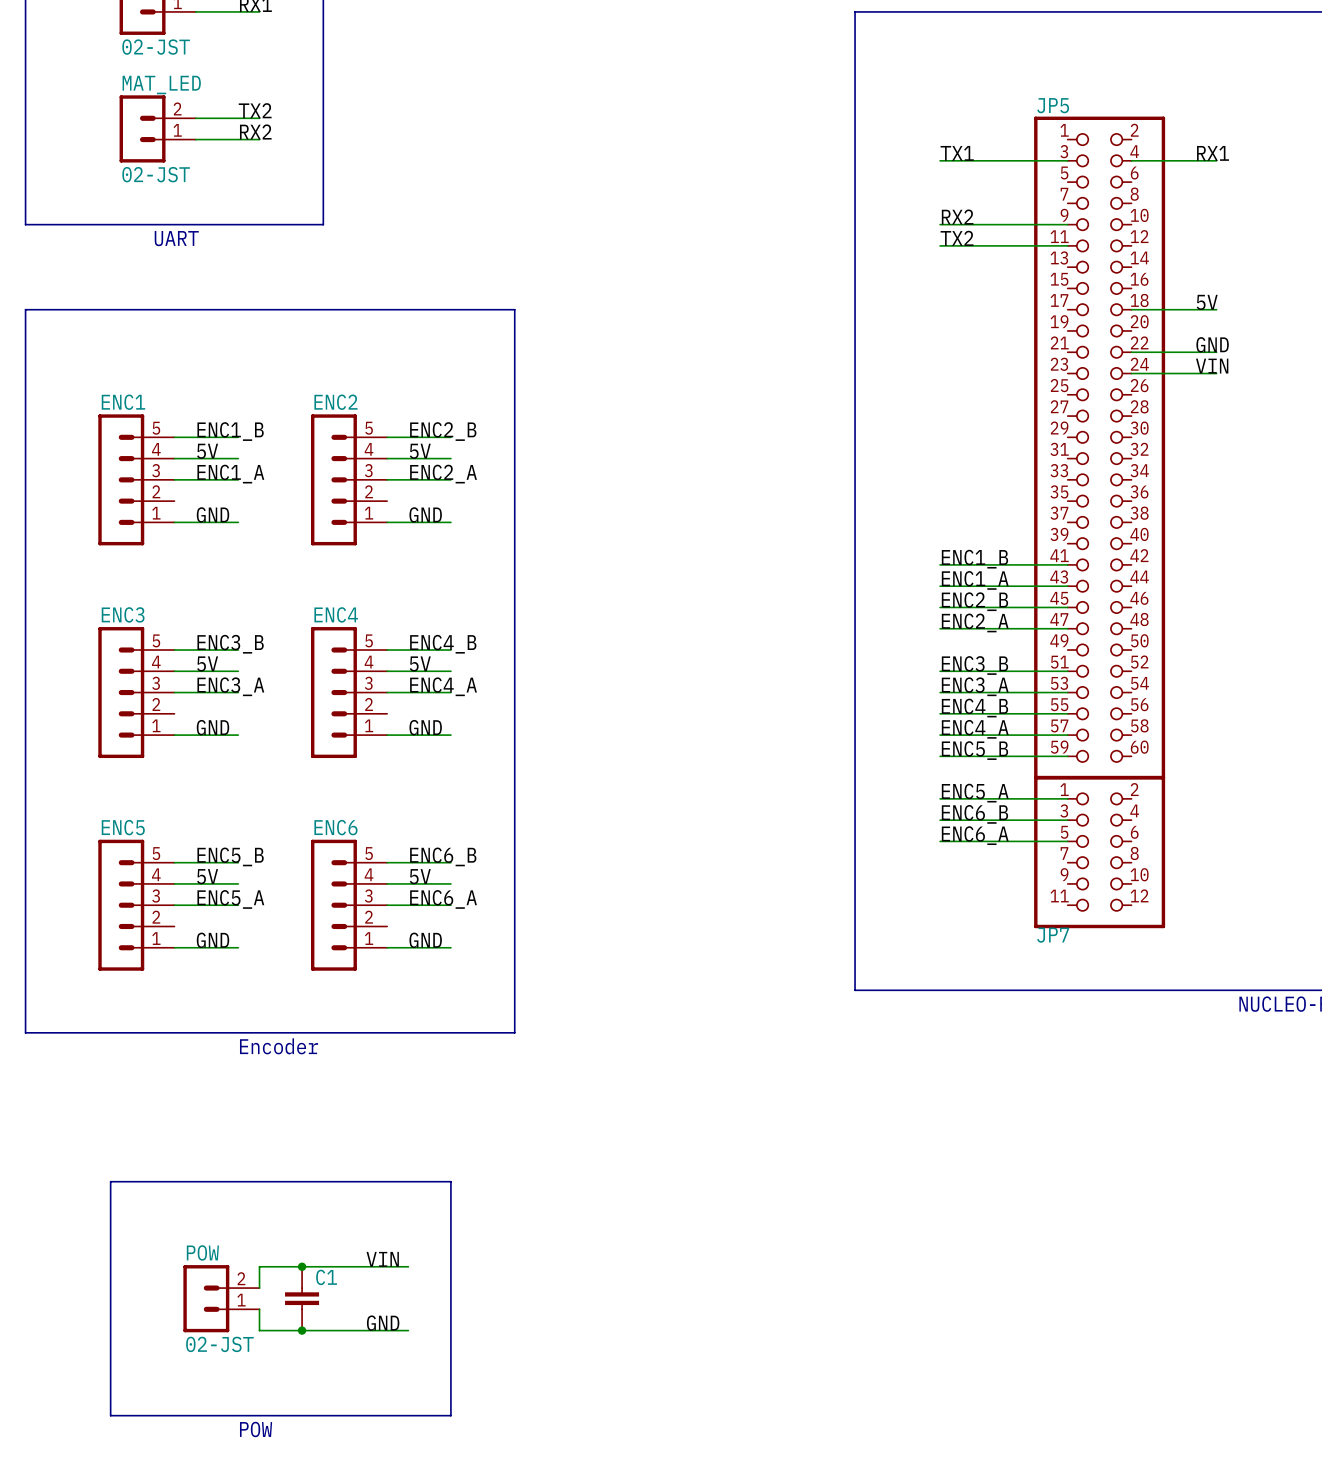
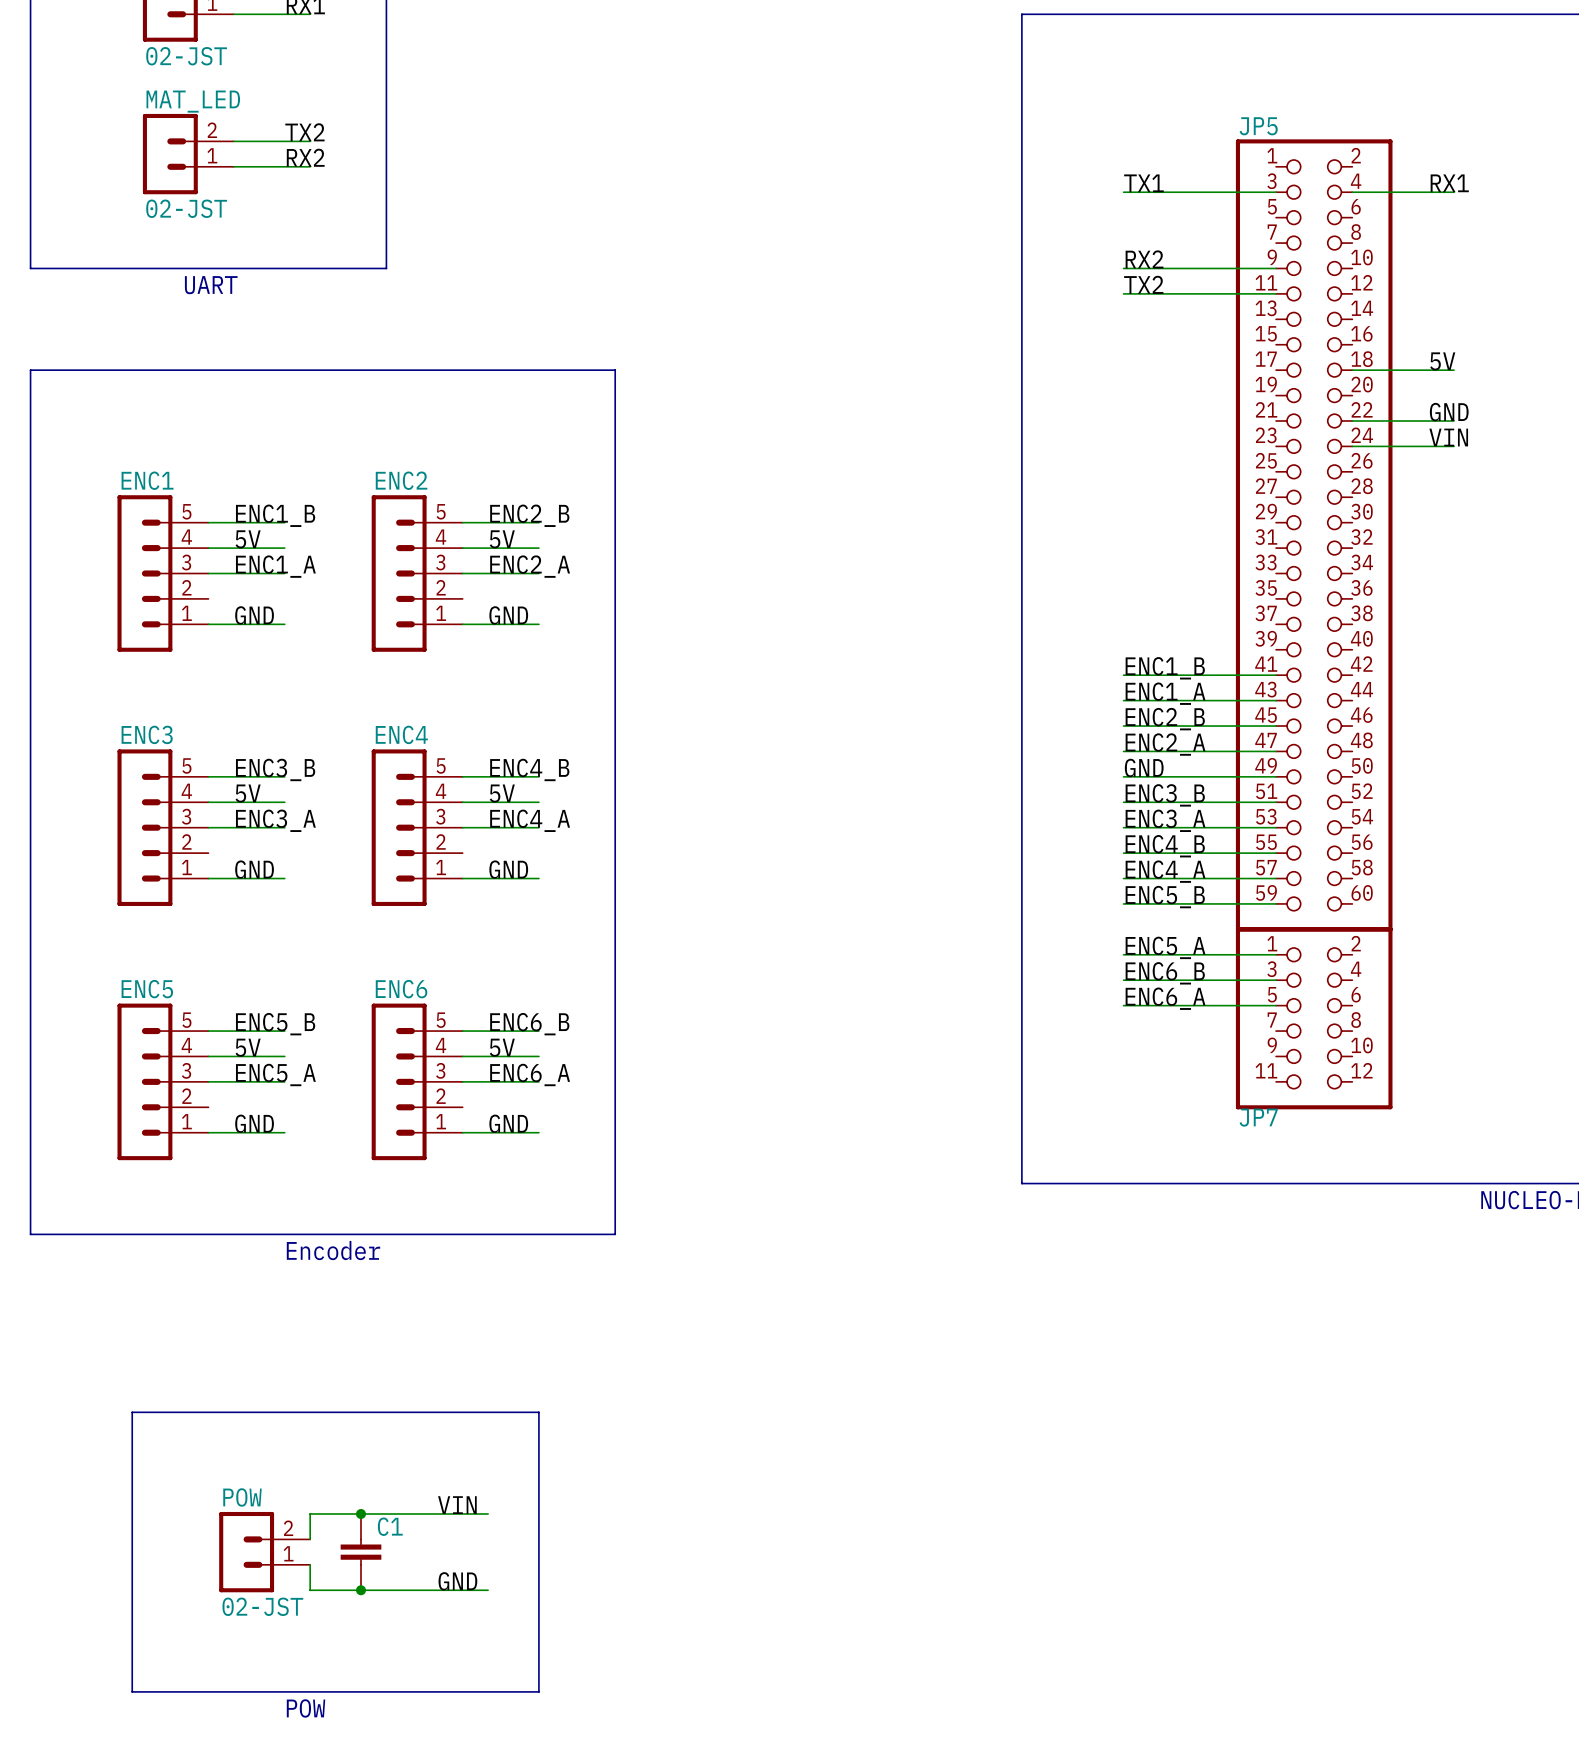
label: none -> GND (1144, 767)
wire: none -> (1123, 776) (1276, 776)

